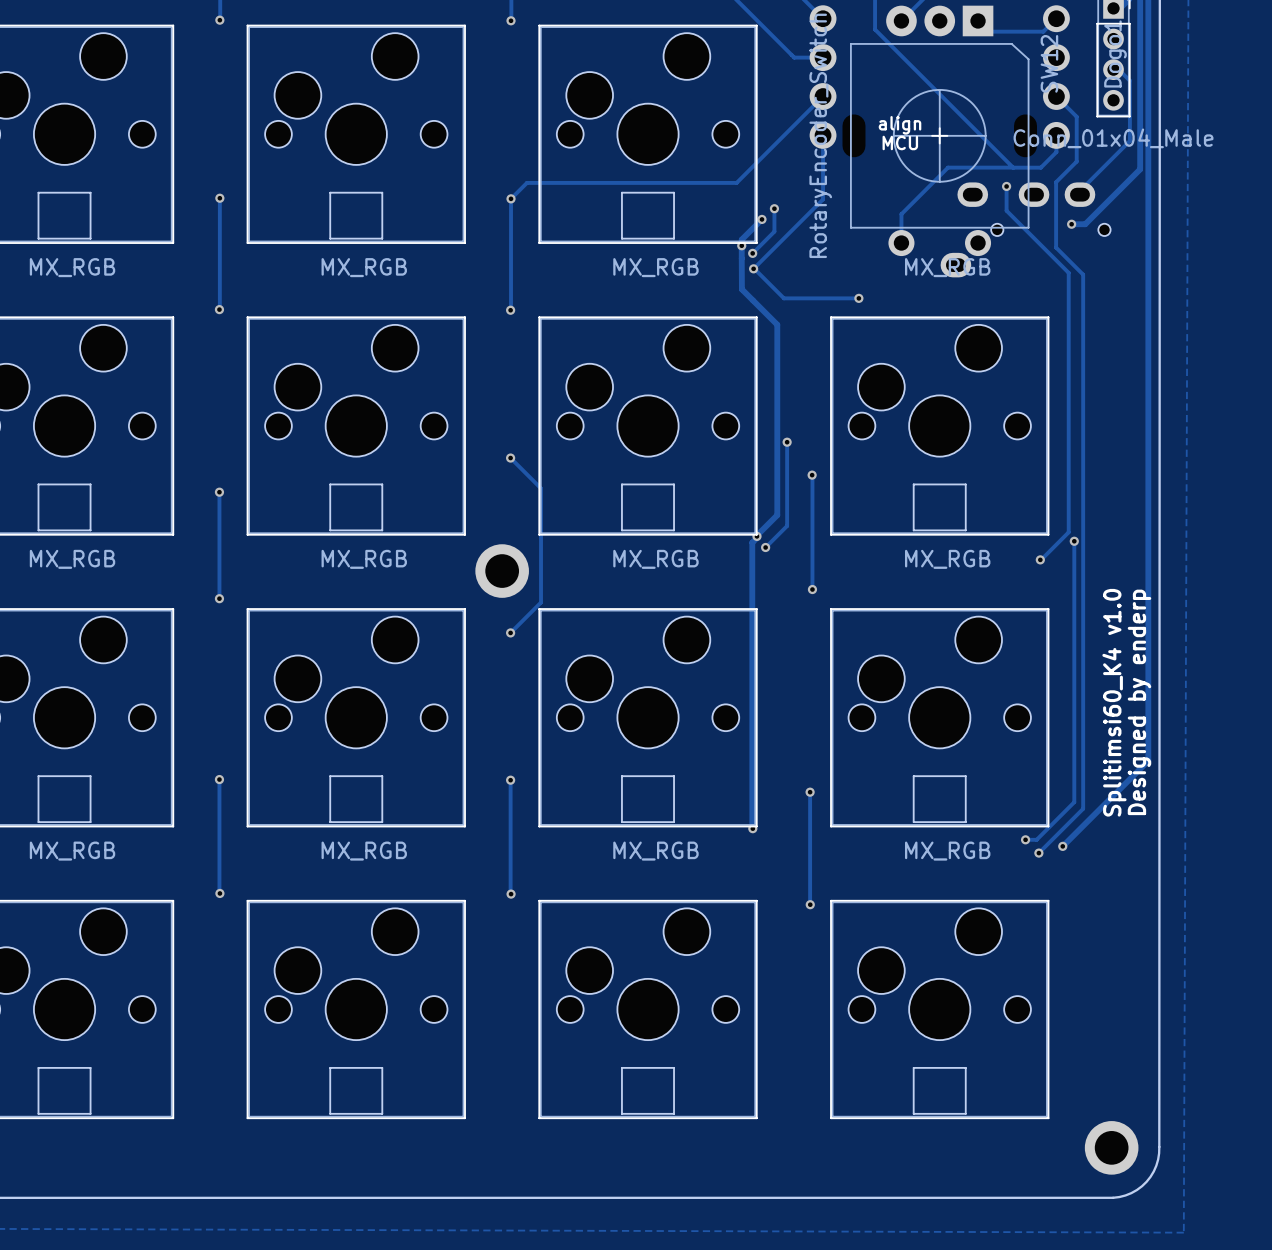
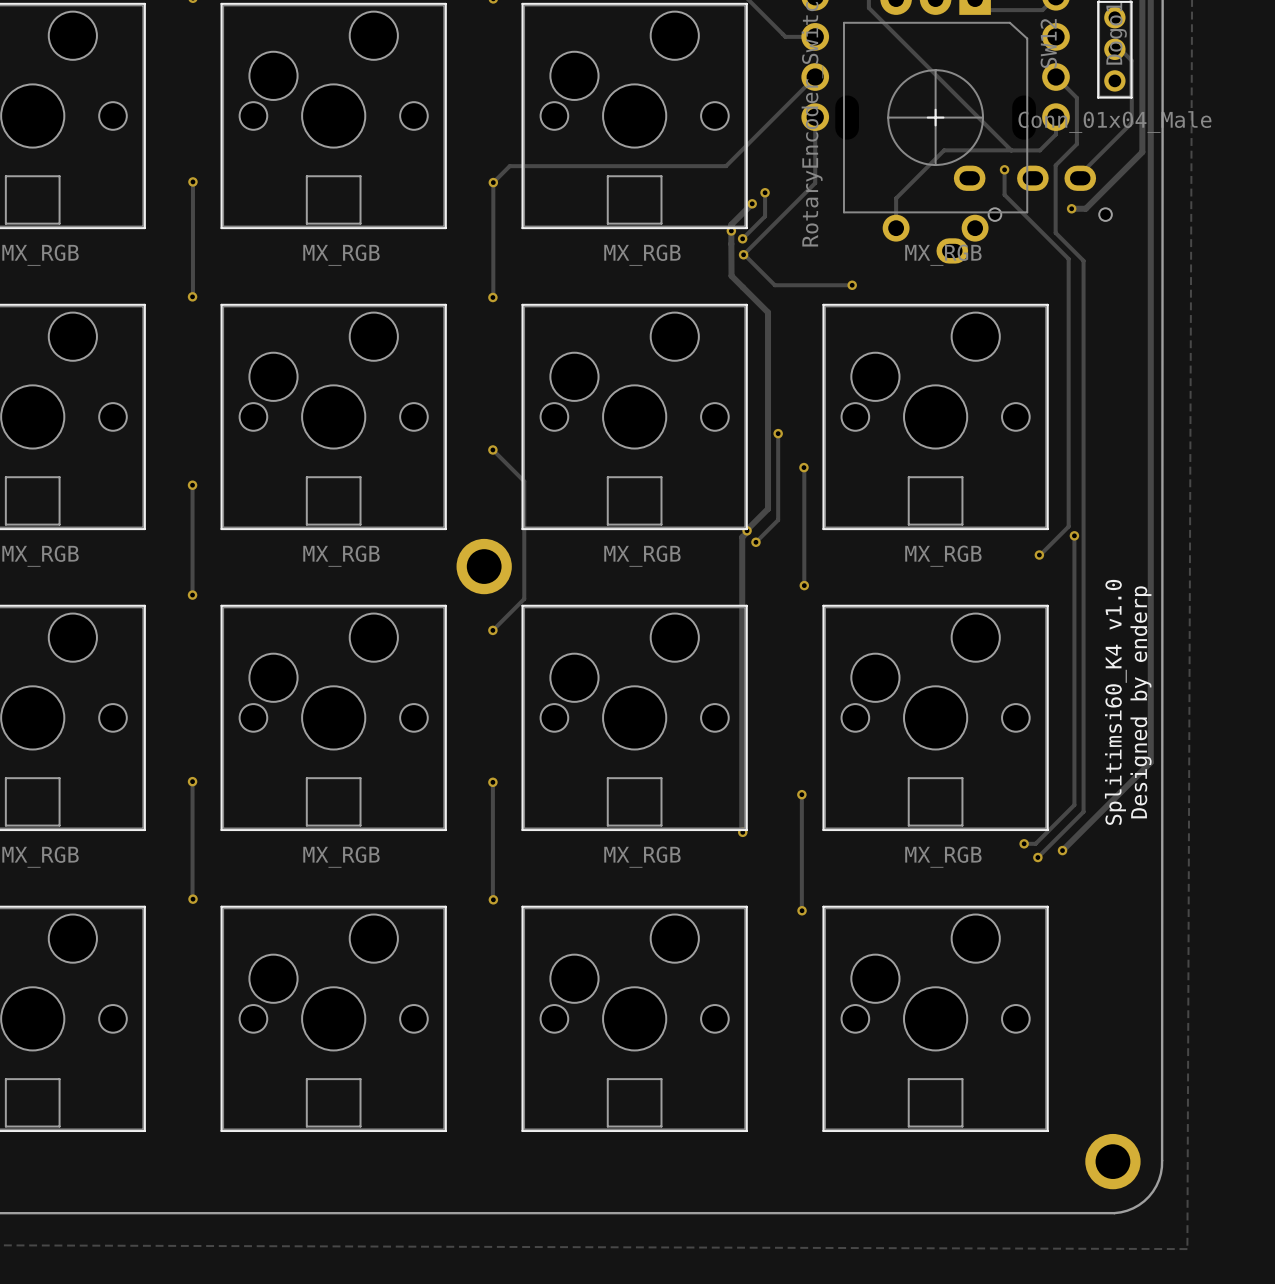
text: align (900, 125) -> none
text: MCU (900, 143) -> none

